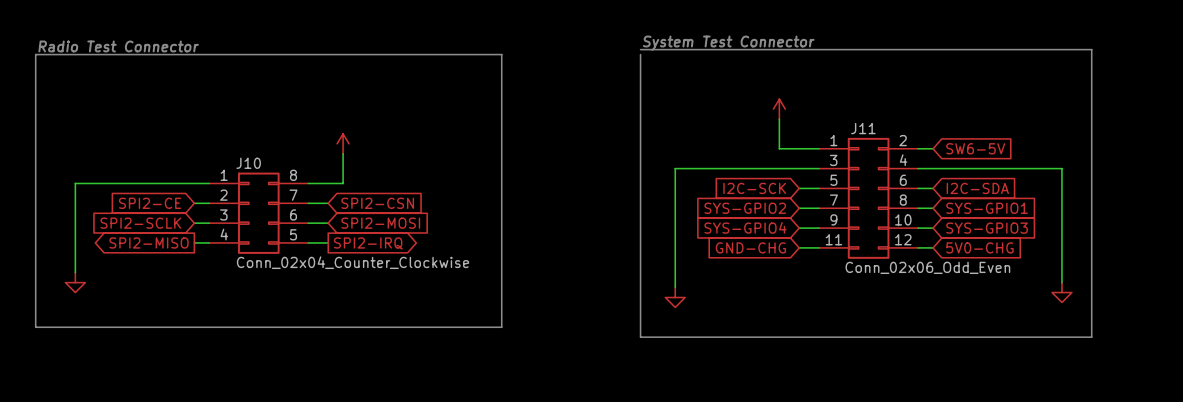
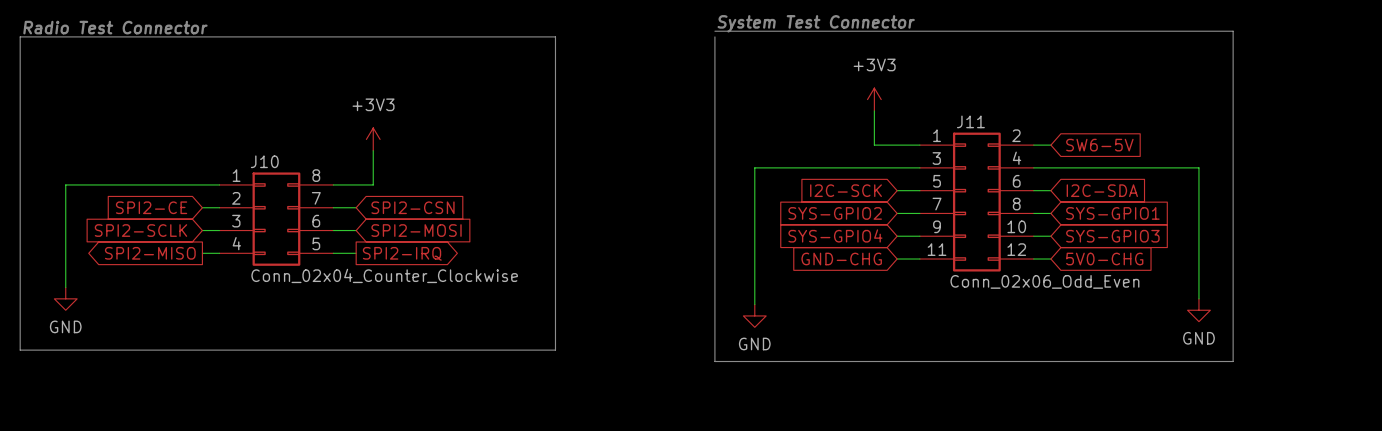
power symbol text: none -> +3V3 (874, 64)
power symbol text: none -> +3V3 (373, 104)
power symbol text: none -> GND (65, 326)
power symbol text: none -> GND (1198, 338)
power symbol text: none -> GND (754, 343)

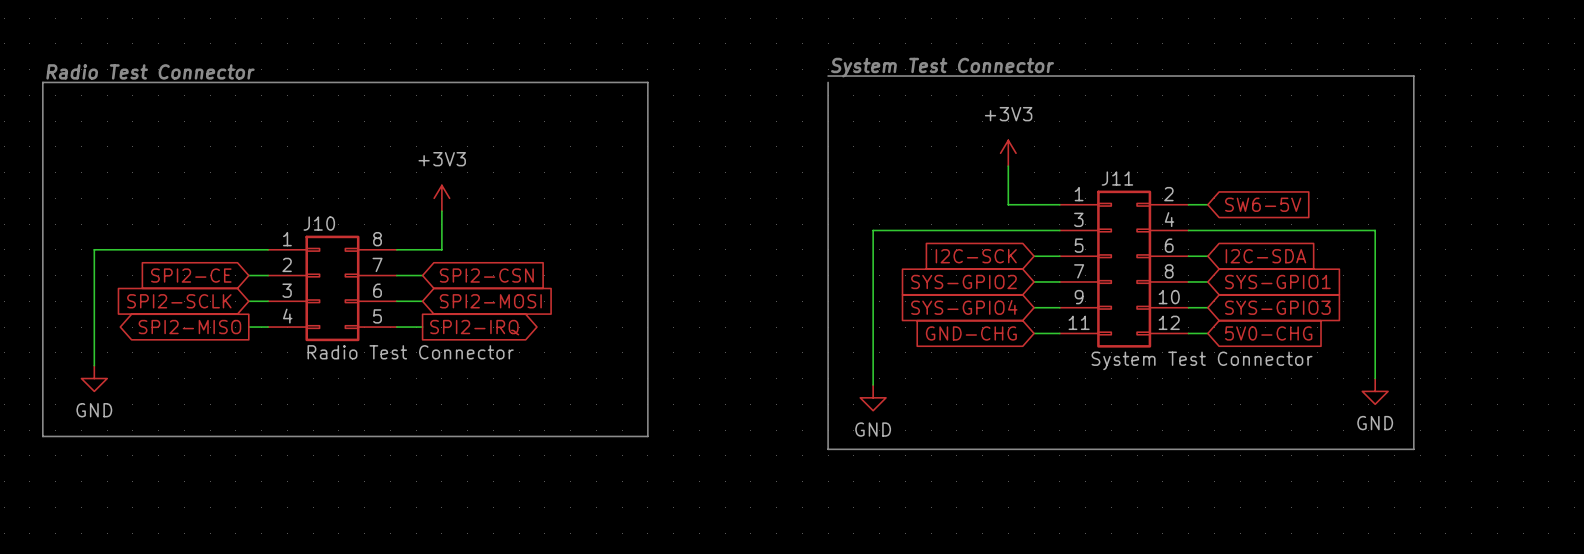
J10 value: Conn_02x04_Counter_Clockwise (384, 275) -> Radio Test Connector (410, 352)
J11 value: Conn_02x06_Odd_Even (1044, 281) -> System Test Connector (1202, 360)

